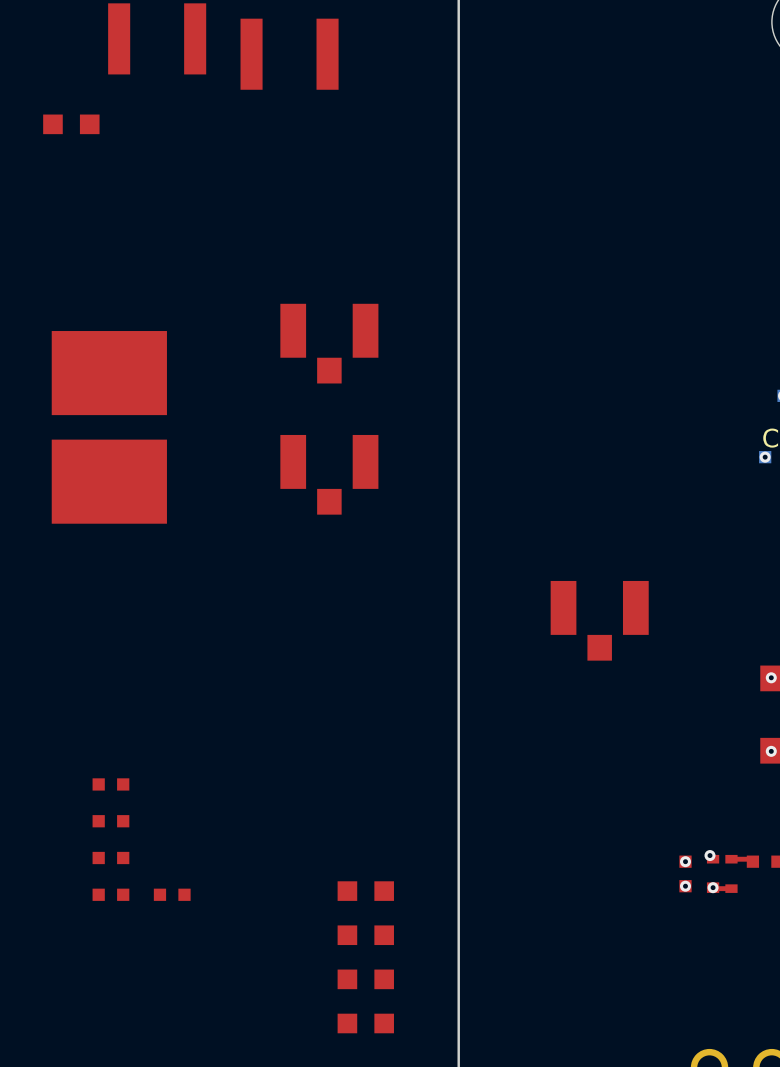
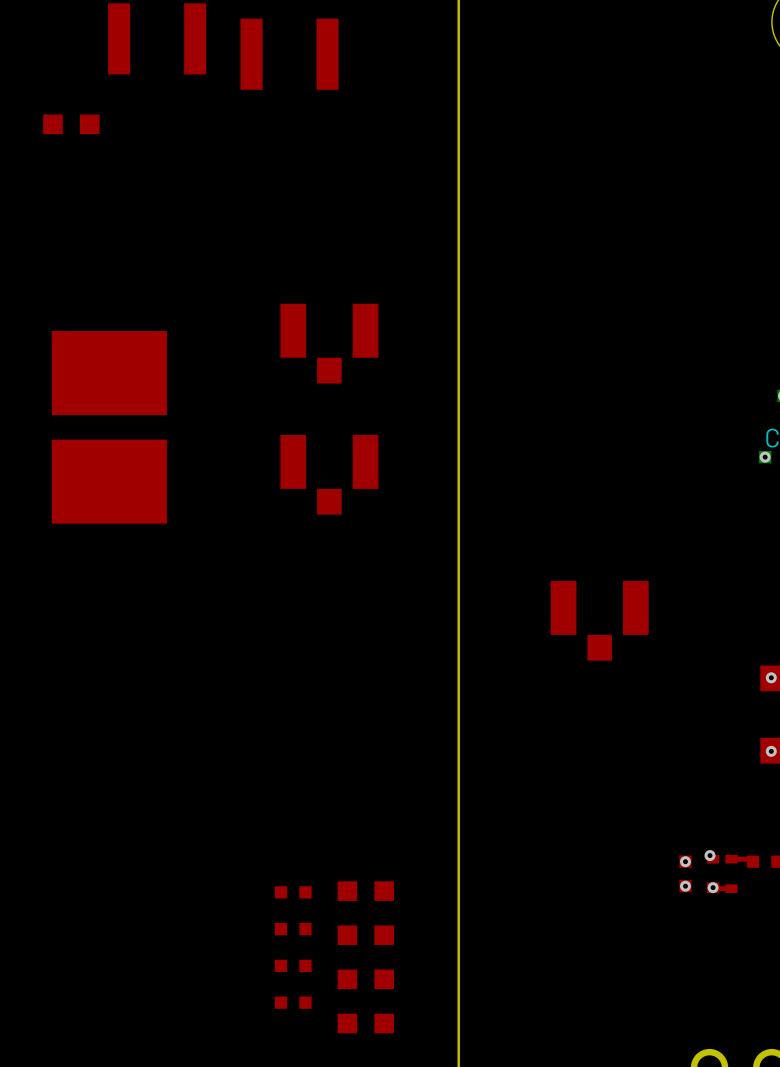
part: (110, 784) -> none
part: (110, 821) -> none
part: (110, 858) -> none
part: none -> (293, 892)
part: (110, 894) -> none
part: (172, 894) -> none
part: none -> (293, 929)
part: none -> (293, 965)
part: none -> (293, 1002)

